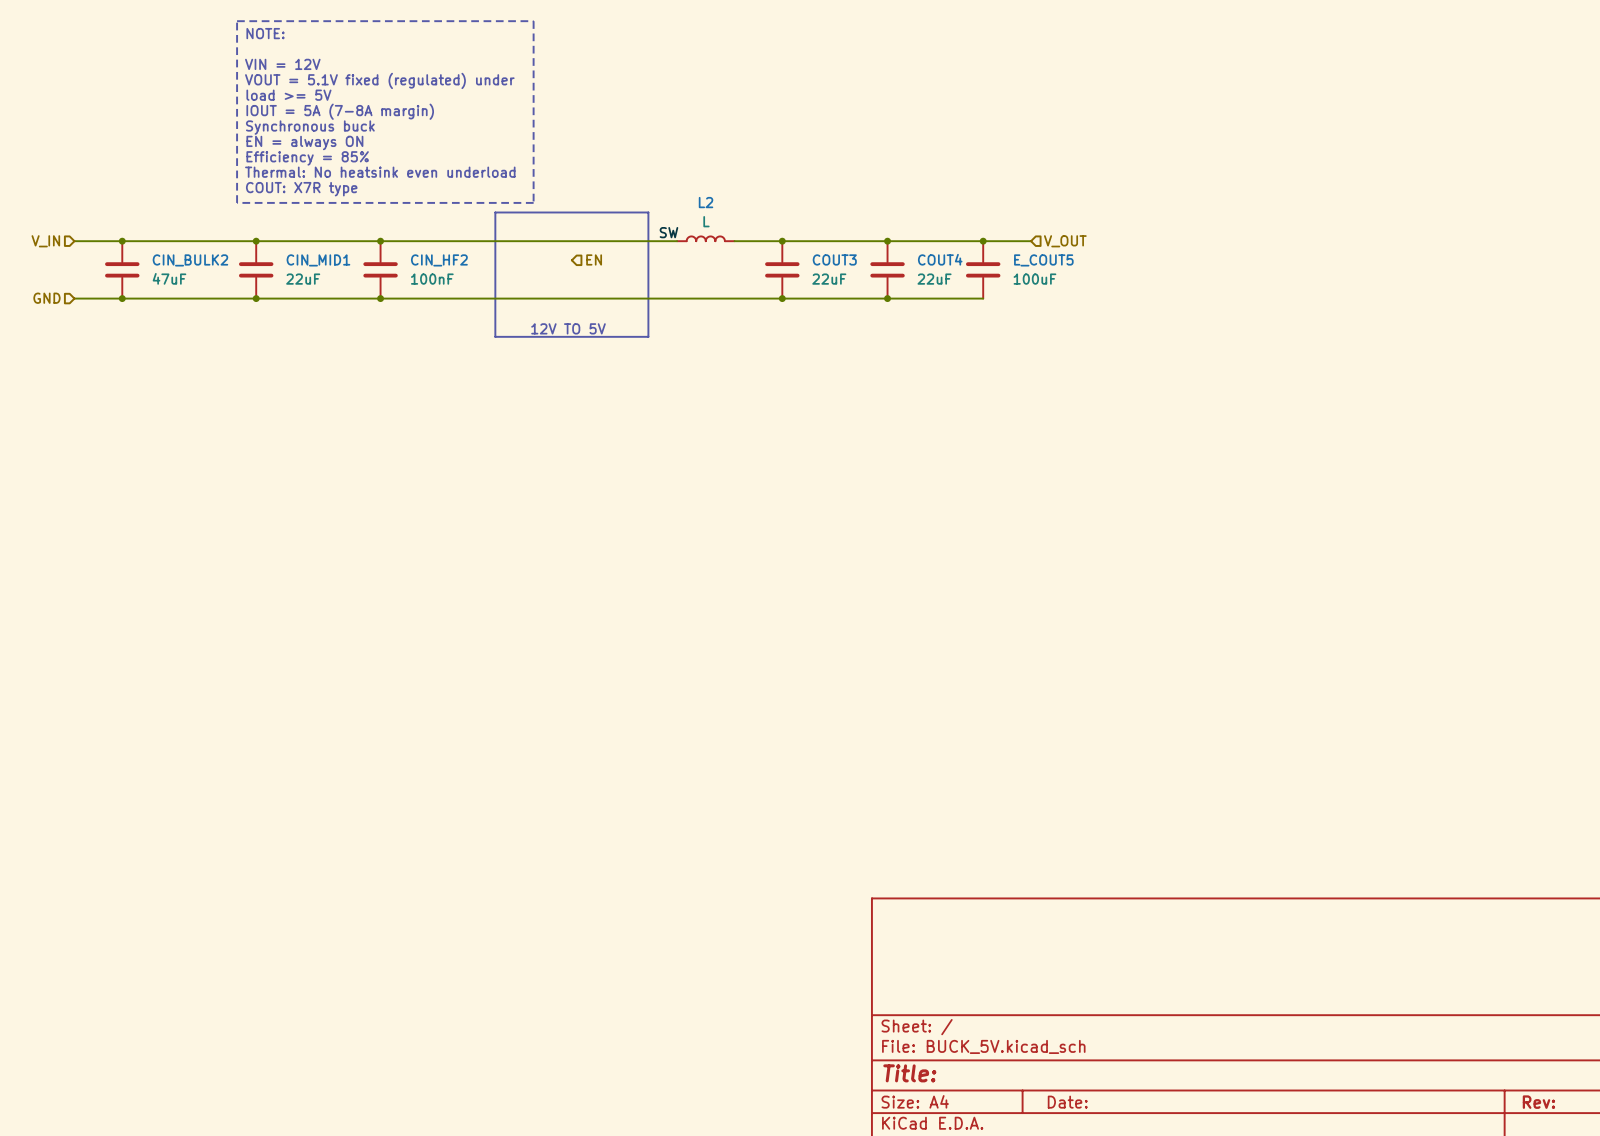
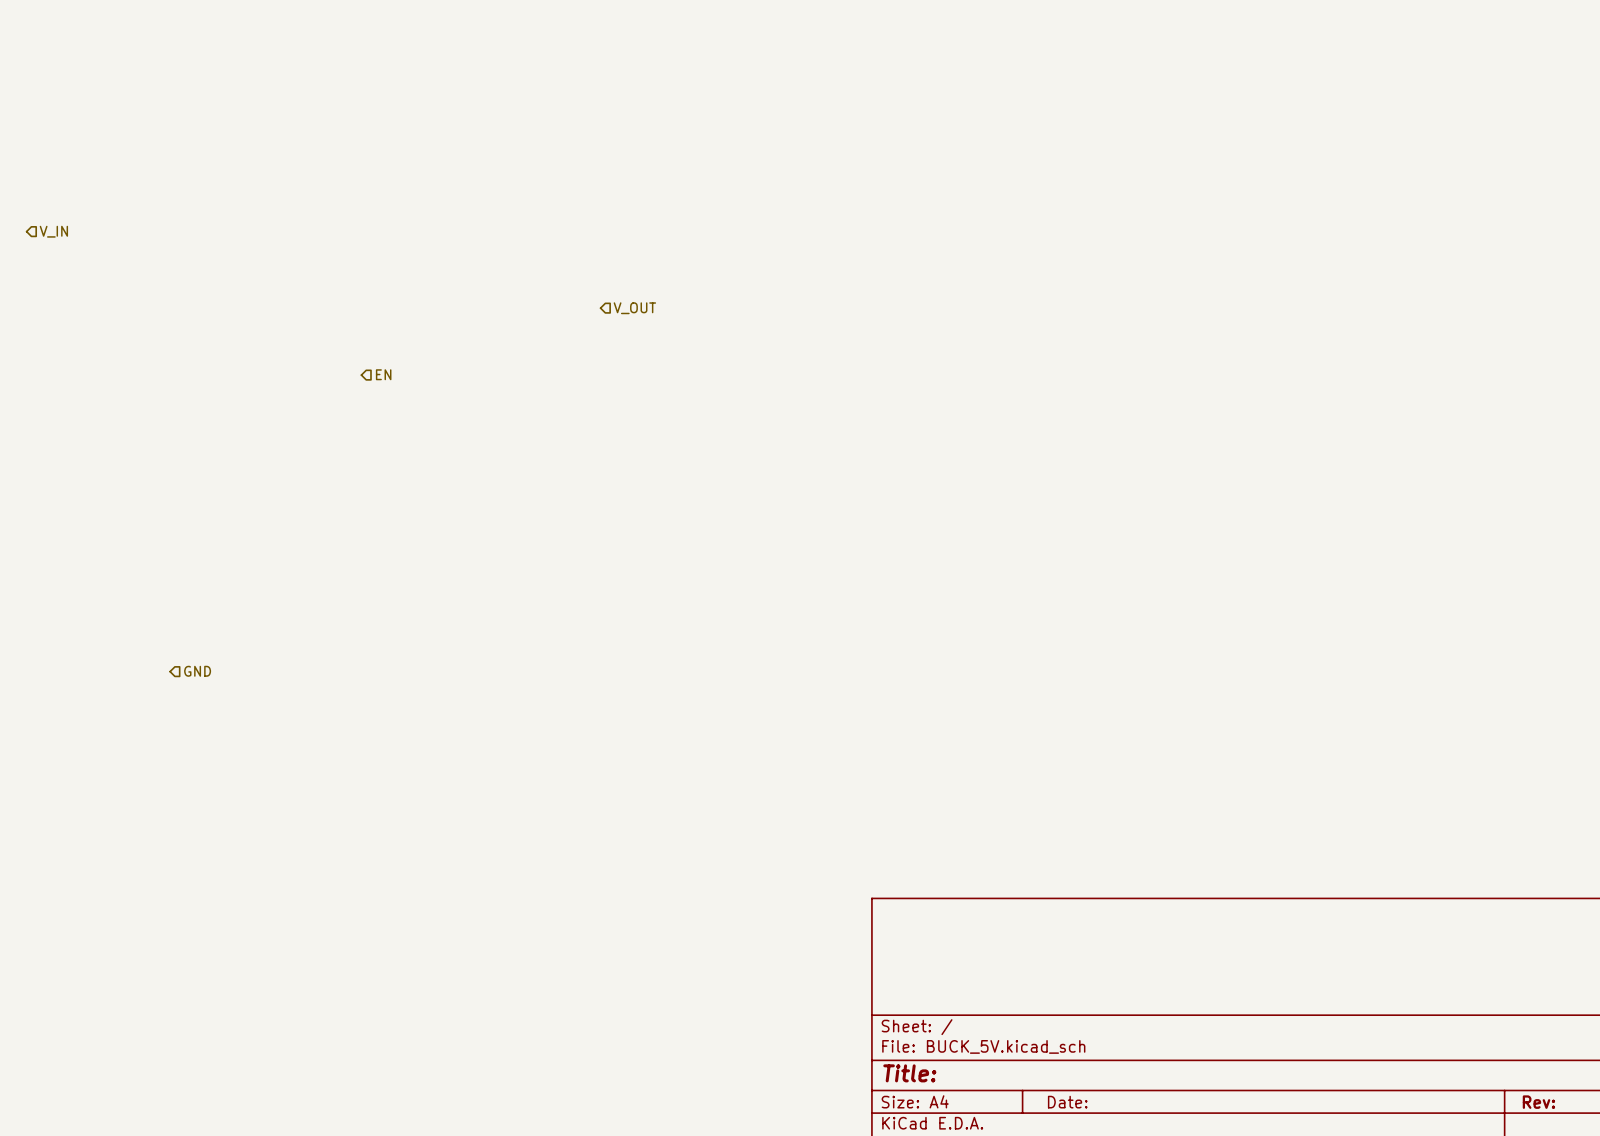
line: (237, 21) (533, 21) (533, 202) (237, 202) (237, 21) -> none
text: NOTE: (265, 33) -> none
text: VIN = 12V (282, 64) -> none
text: VOUT = 5.1V fixed (regulated) under (379, 80) -> none
text: load >= 5V (288, 95) -> none
text: IOUT = 5A (7-8A margin) (340, 111) -> none
text: Synchronous buck (310, 127) -> none
text: EN = always ON (304, 142) -> none
text: Efficiency = 85% (307, 158) -> none
text: Thermal: No heatsink even underload (380, 172) -> none
text: COUT: X7R type (301, 189) -> none
line: (495, 212) (648, 212) (648, 336) (495, 336) (495, 212) -> none
label: SW (668, 232) -> none
L2: L (705, 238) -> none
hierarchical label rotation: 0° (45, 241) -> 180° (53, 231)
wire: (74, 241) (677, 241) -> none
junction: (122, 241) -> none
junction: (256, 241) -> none
junction: (380, 241) -> none
wire: (734, 241) (1031, 241) -> none
junction: (782, 241) -> none
junction: (887, 241) -> none
junction: (983, 241) -> none
hierarchical label: V_OUT (1065, 241) -> none
hierarchical label: EN (594, 259) -> none
CIN_BULK2: 47uF (122, 269) -> none
CIN_MID1: 22uF (256, 269) -> none
CIN_HF2: 100nF (380, 269) -> none
COUT3: 22uF (782, 269) -> none
COUT4: 22uF (887, 269) -> none
E_COUT5: 100uF (983, 269) -> none
hierarchical label: GND (46, 298) -> none
wire: (74, 298) (983, 298) -> none
junction: (122, 298) -> none
junction: (256, 298) -> none
junction: (380, 298) -> none
junction: (782, 298) -> none
junction: (887, 298) -> none
hierarchical label: none -> V_OUT (634, 308)
text: 12V TO 5V (568, 328) -> none
hierarchical label: none -> EN (383, 374)
hierarchical label: none -> GND (197, 671)

